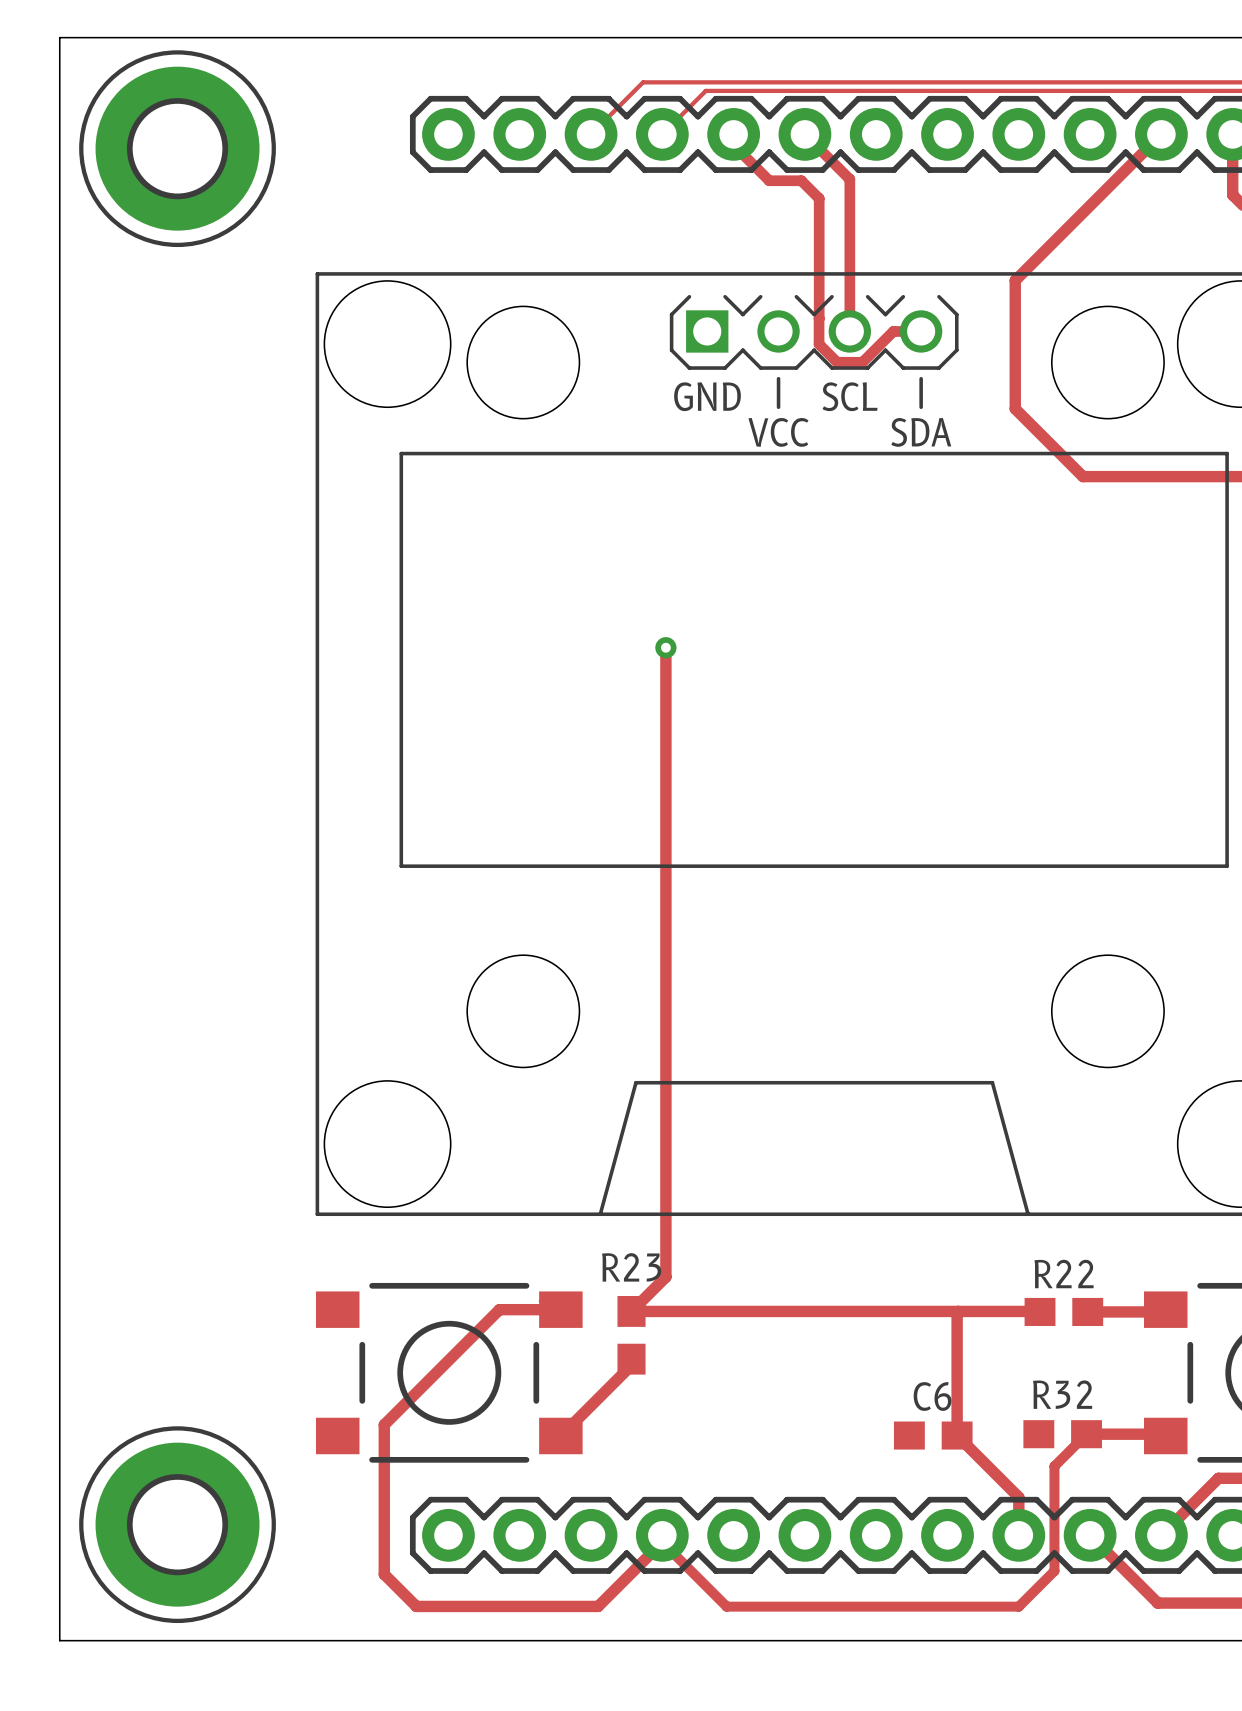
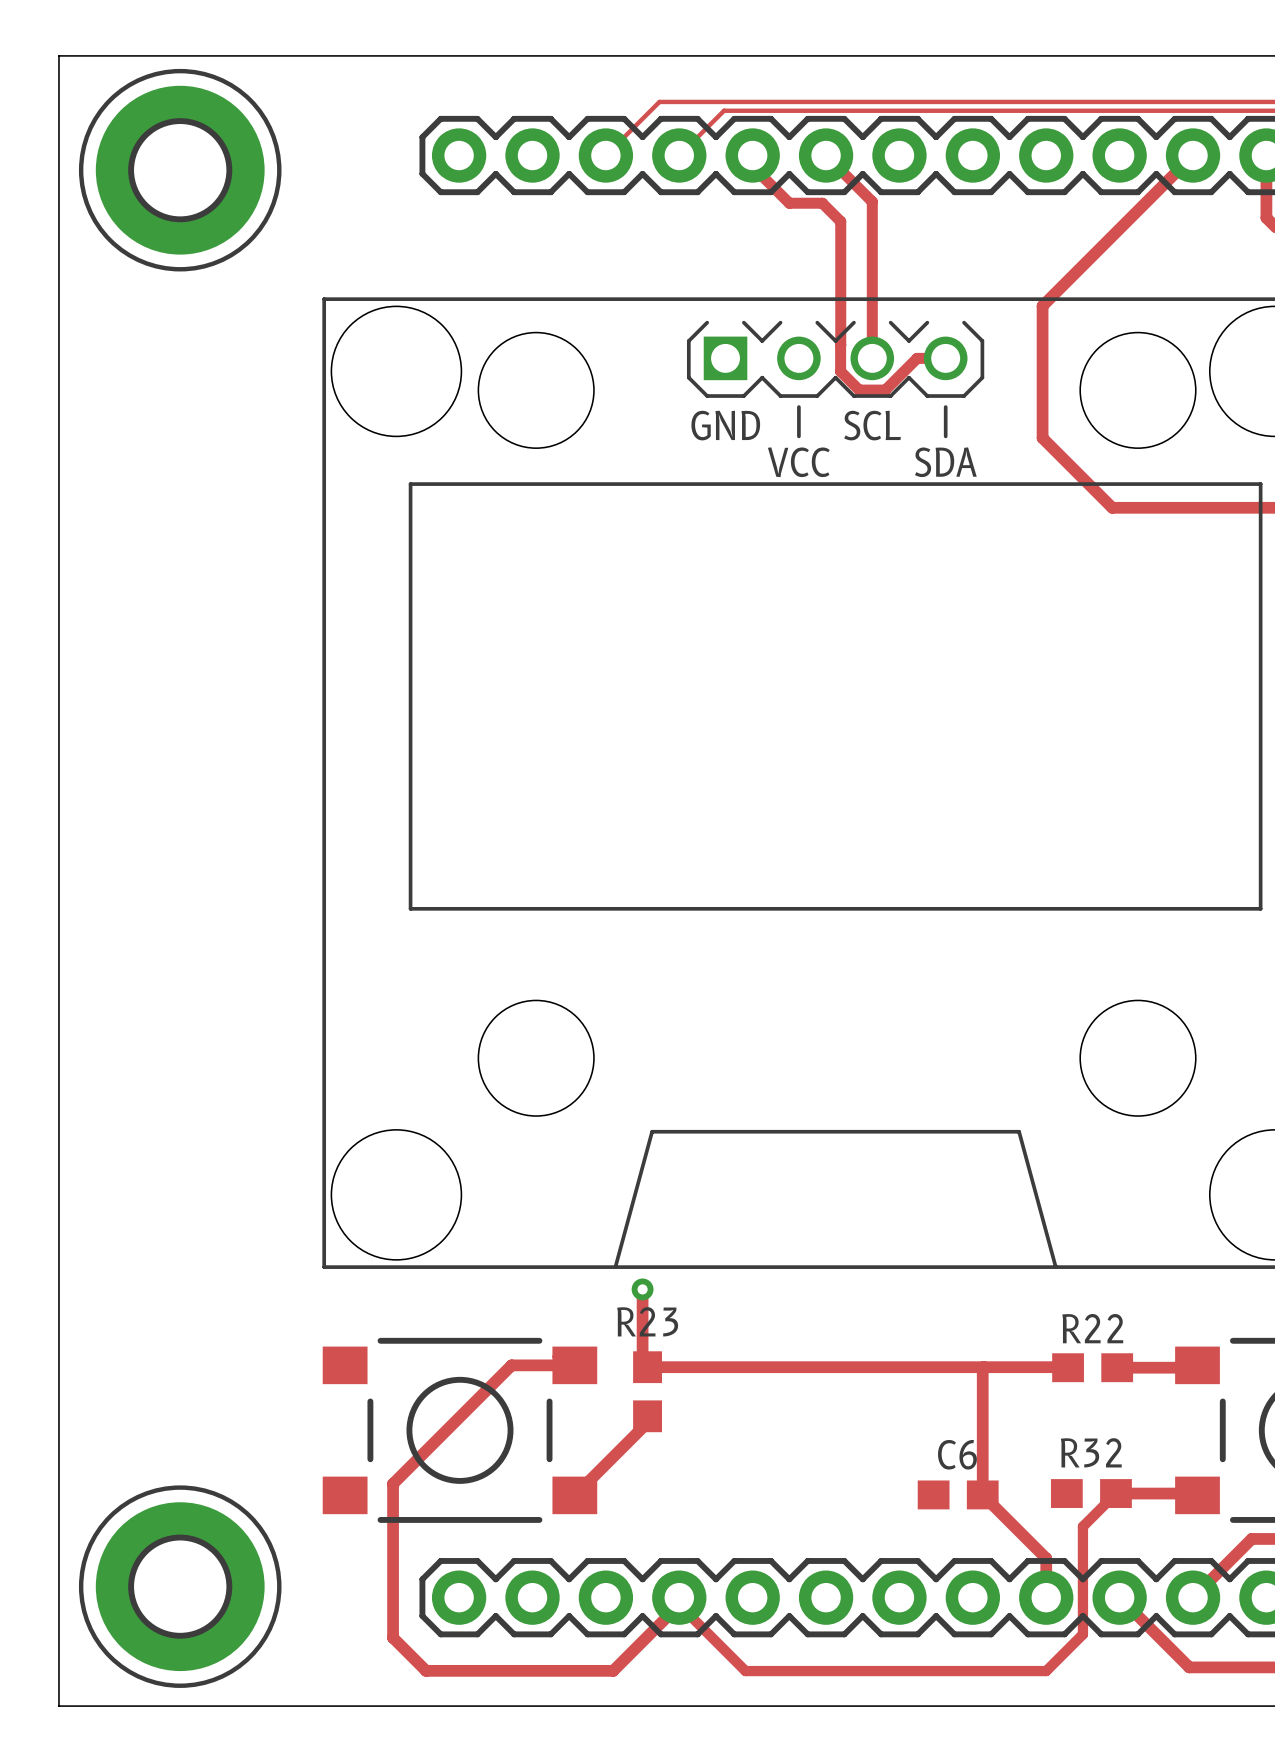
track: (665, 647) (665, 1277) (631, 1311) -> (642, 1289) (642, 1362) (647, 1367)
via: (665, 647) -> none
via: none -> (642, 1289)

